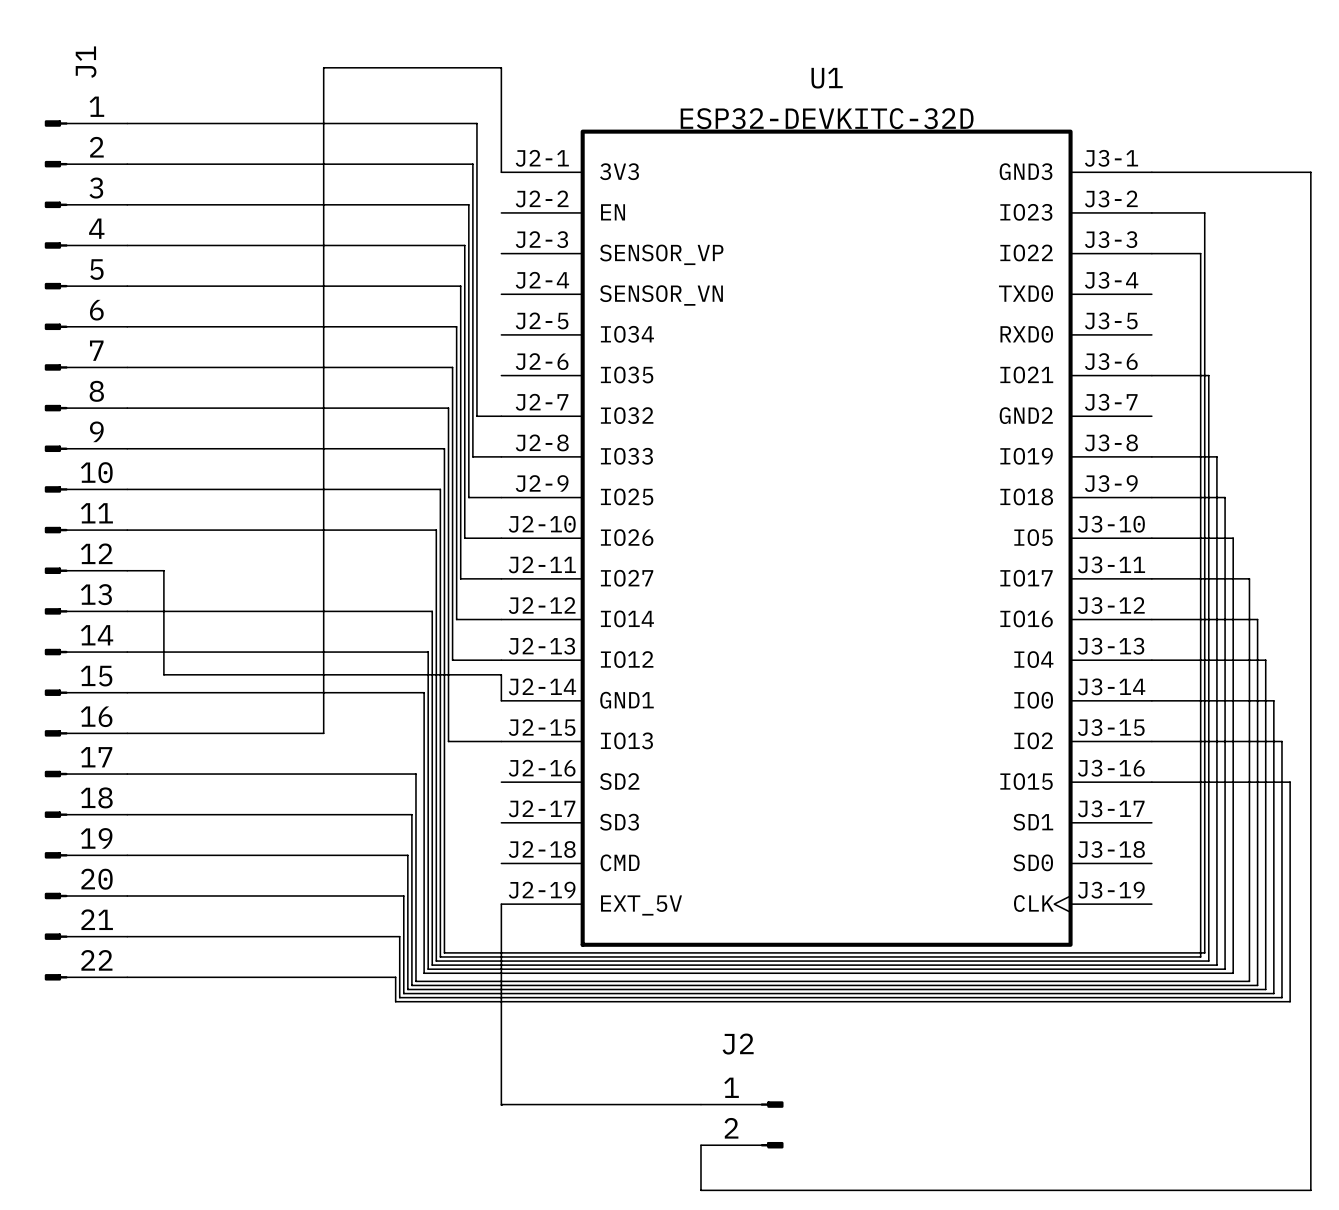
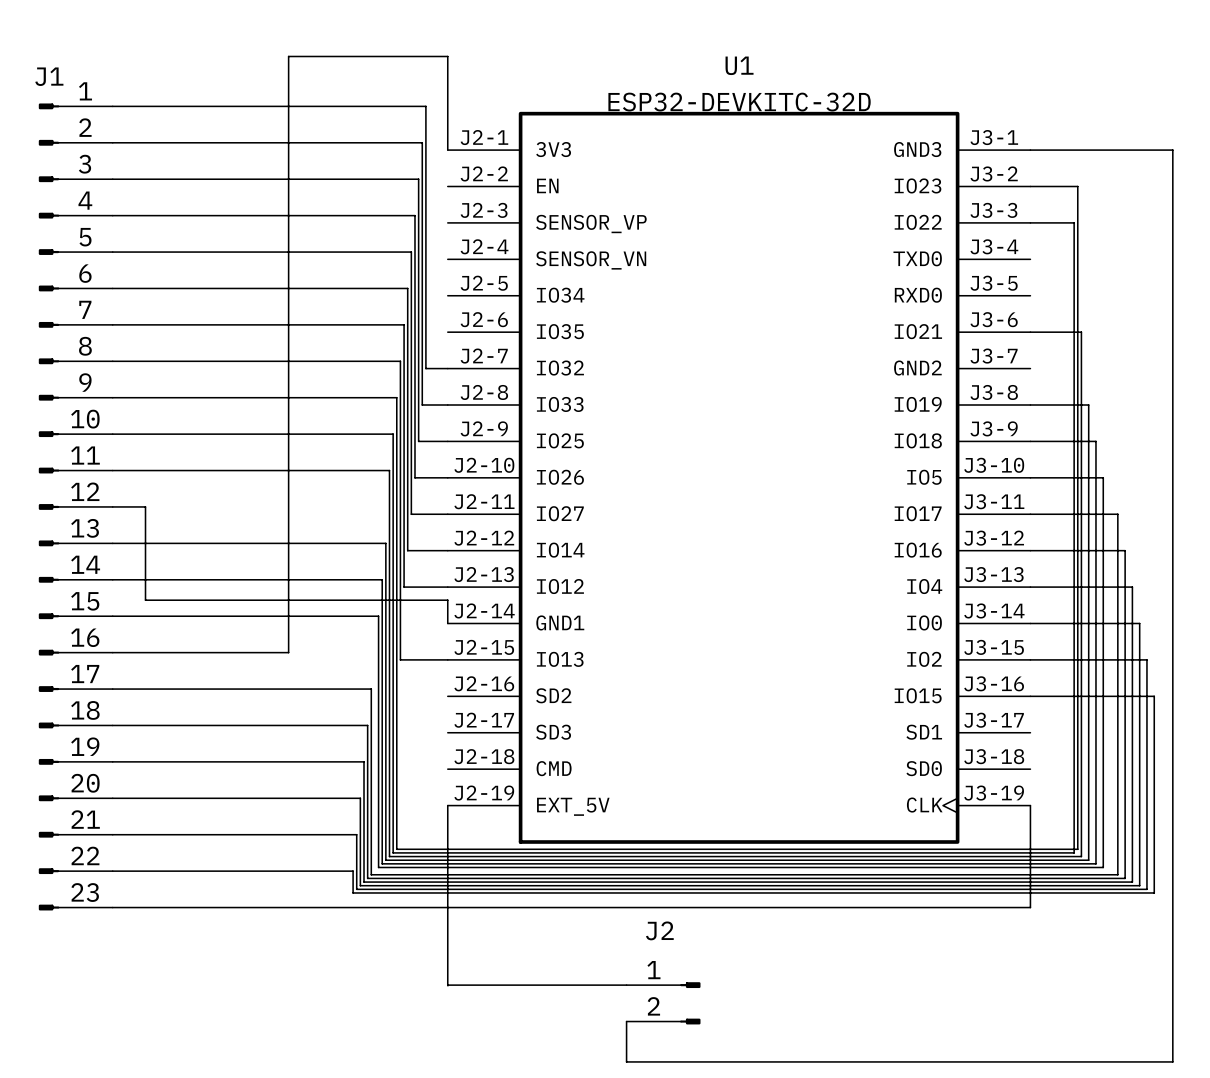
J1 symbol: [44, 120, 128, 981] -> [38, 103, 113, 911]
wire: none -> (1030, 805) (1030, 907) (112, 907)

